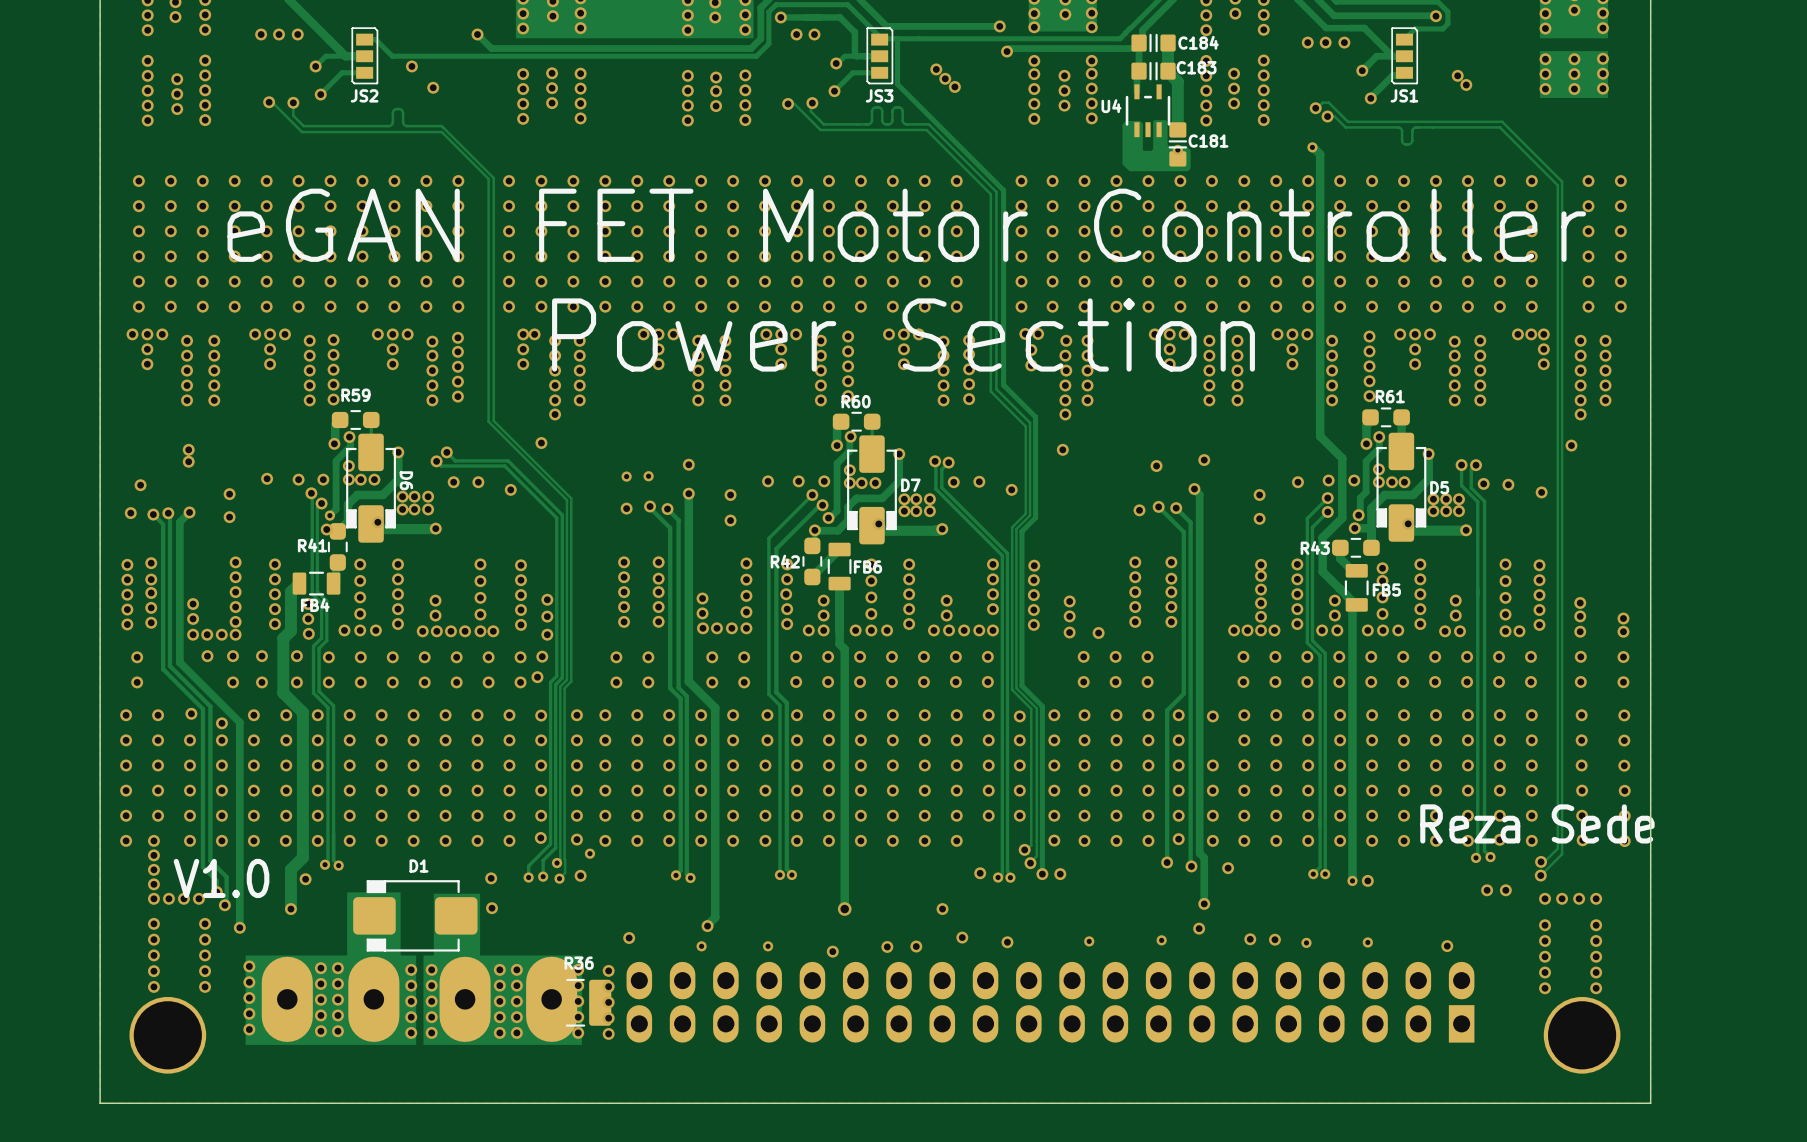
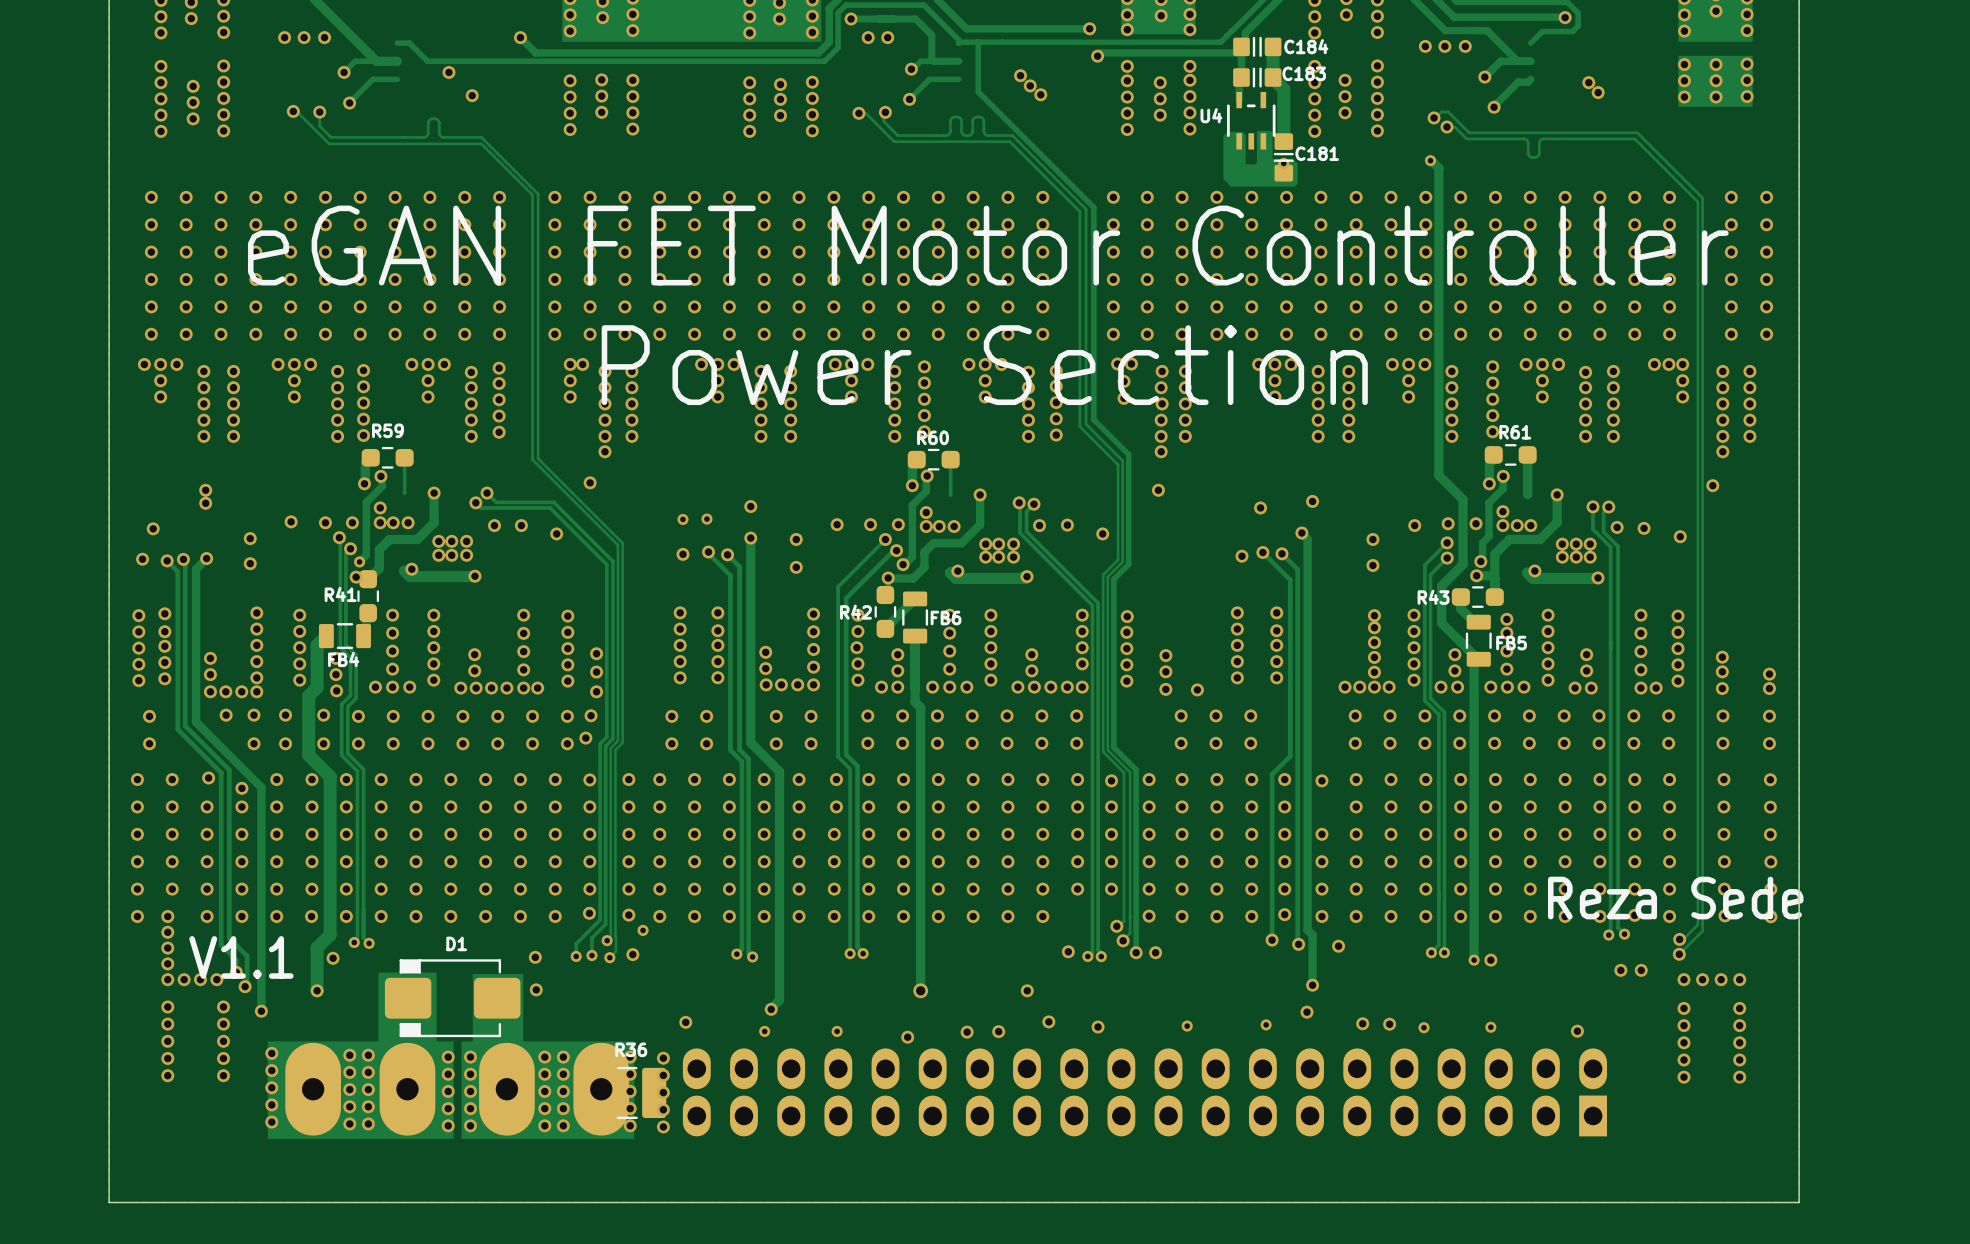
JS2: (364, 55) -> none
JS3: (879, 55) -> none
JS1: (1404, 55) -> none
D5: (1401, 487) -> none
D6: (371, 488) -> none
D7: (871, 489) -> none
text: V1.0 (221, 878) -> V1.1 (241, 957)
part: (167, 1035) -> none
part: (1582, 1035) -> none

